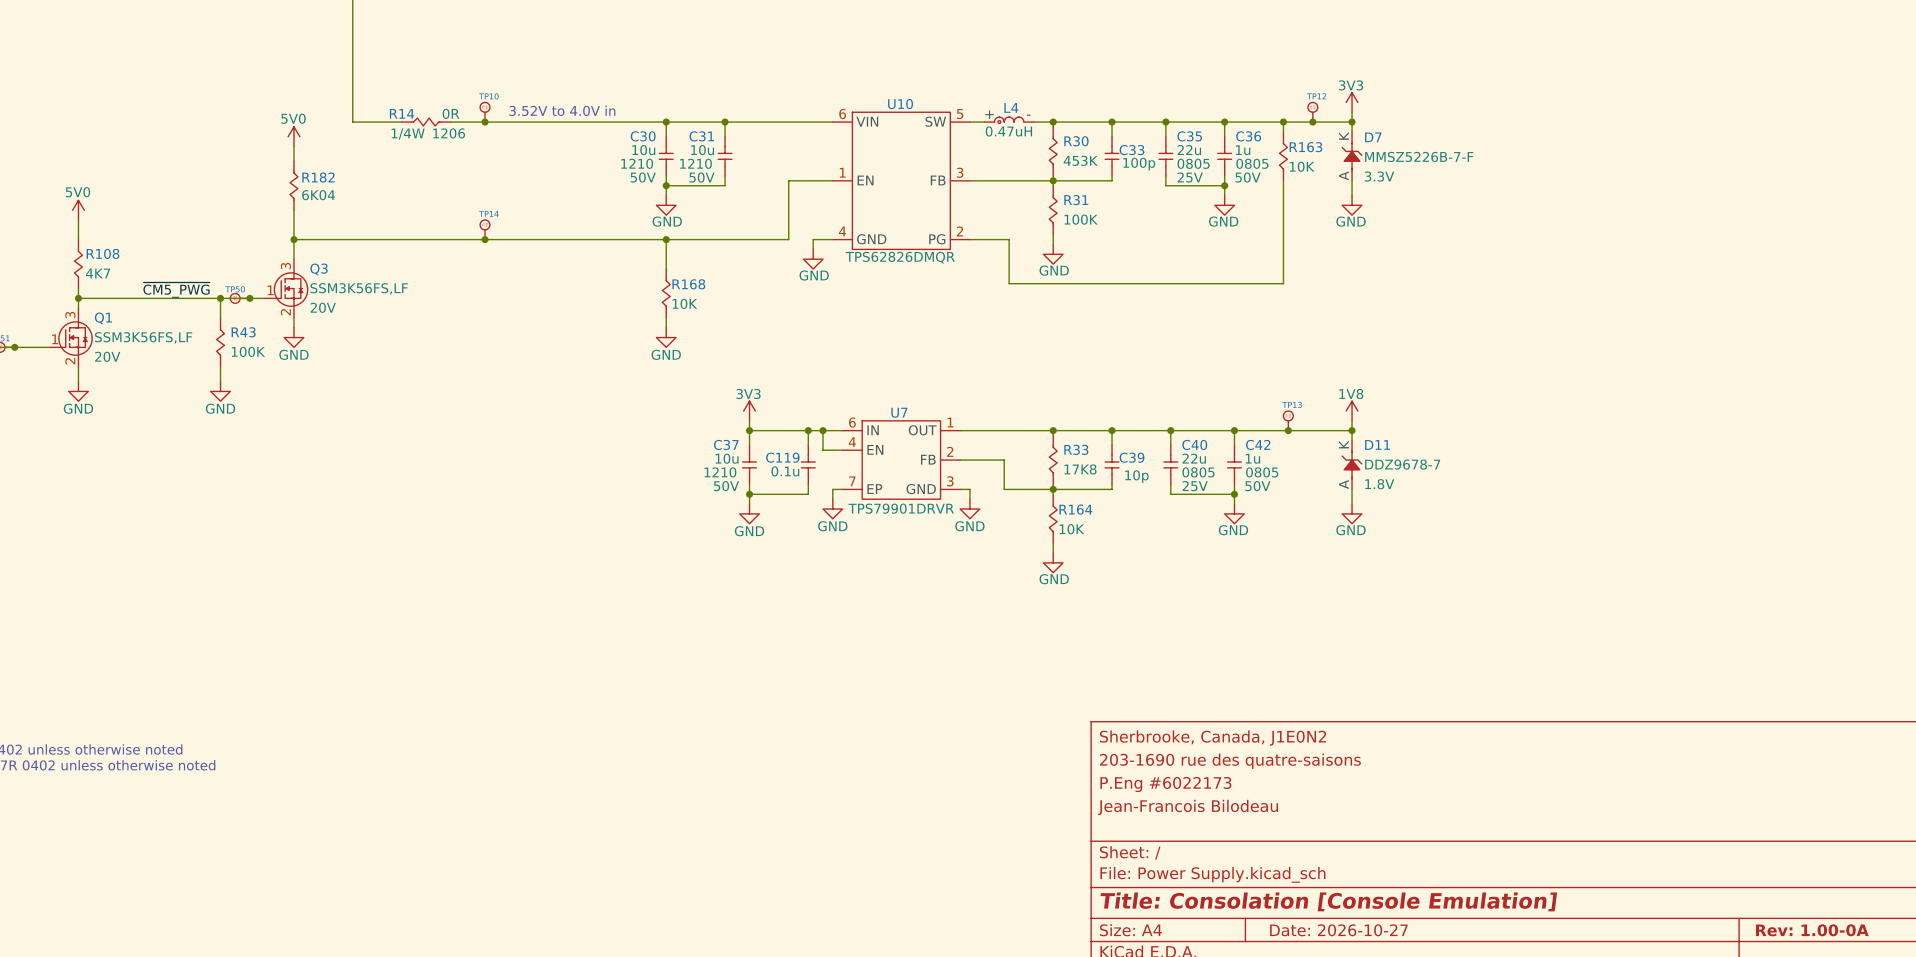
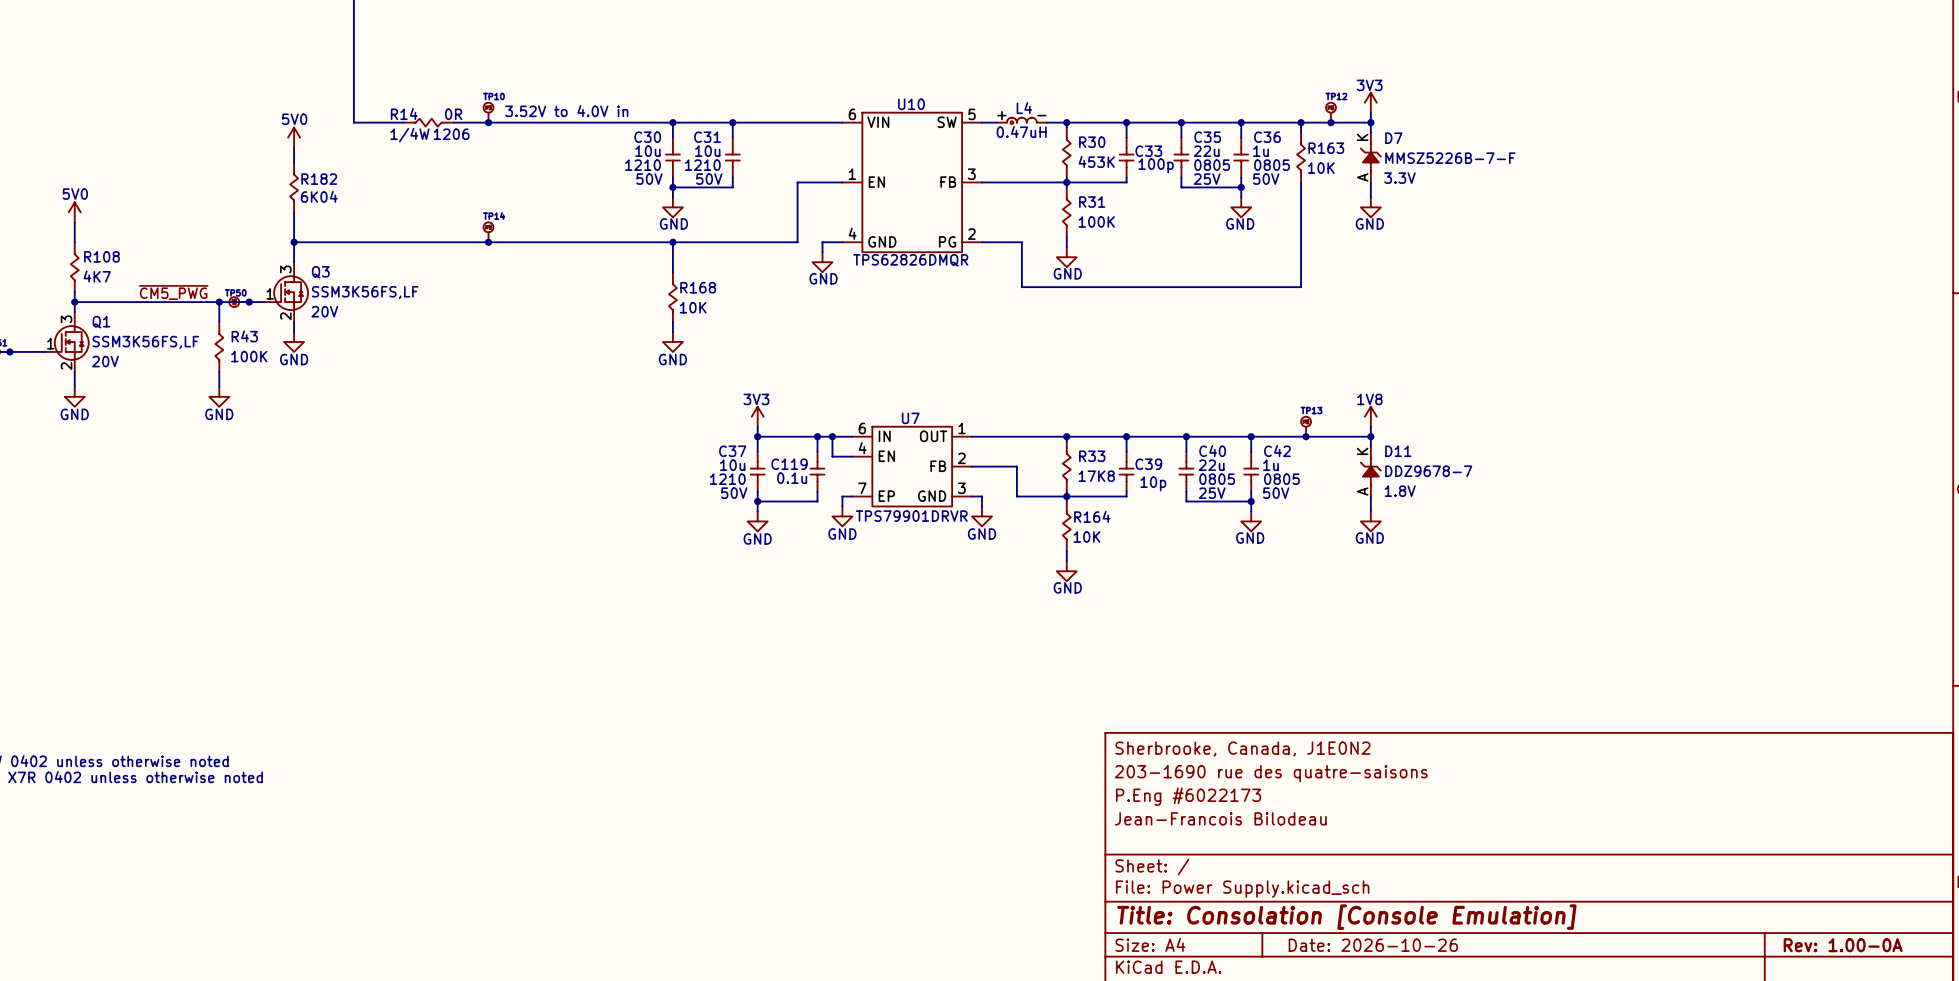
title block: Date: 2026-10-27 (1338, 930) -> Date: 2026-10-26 (1373, 945)

